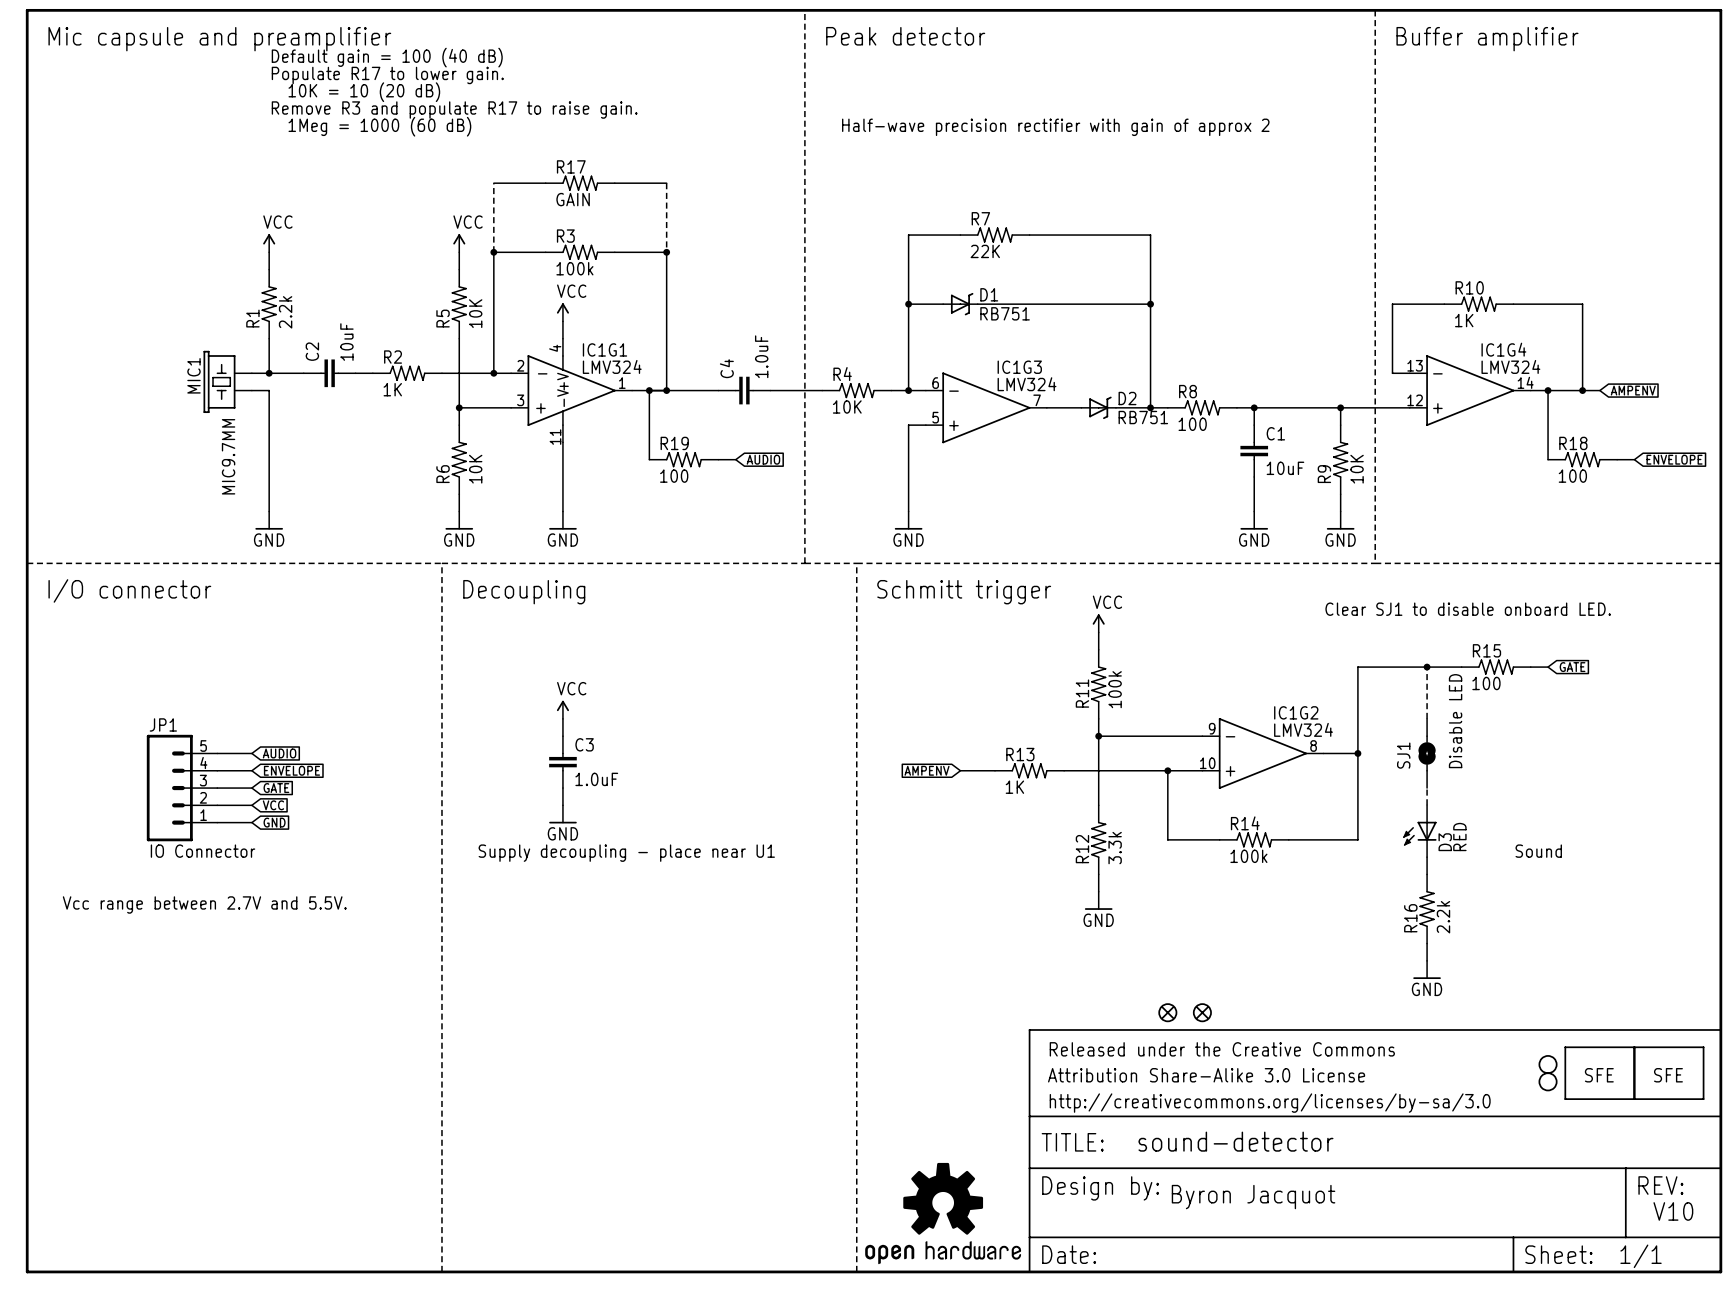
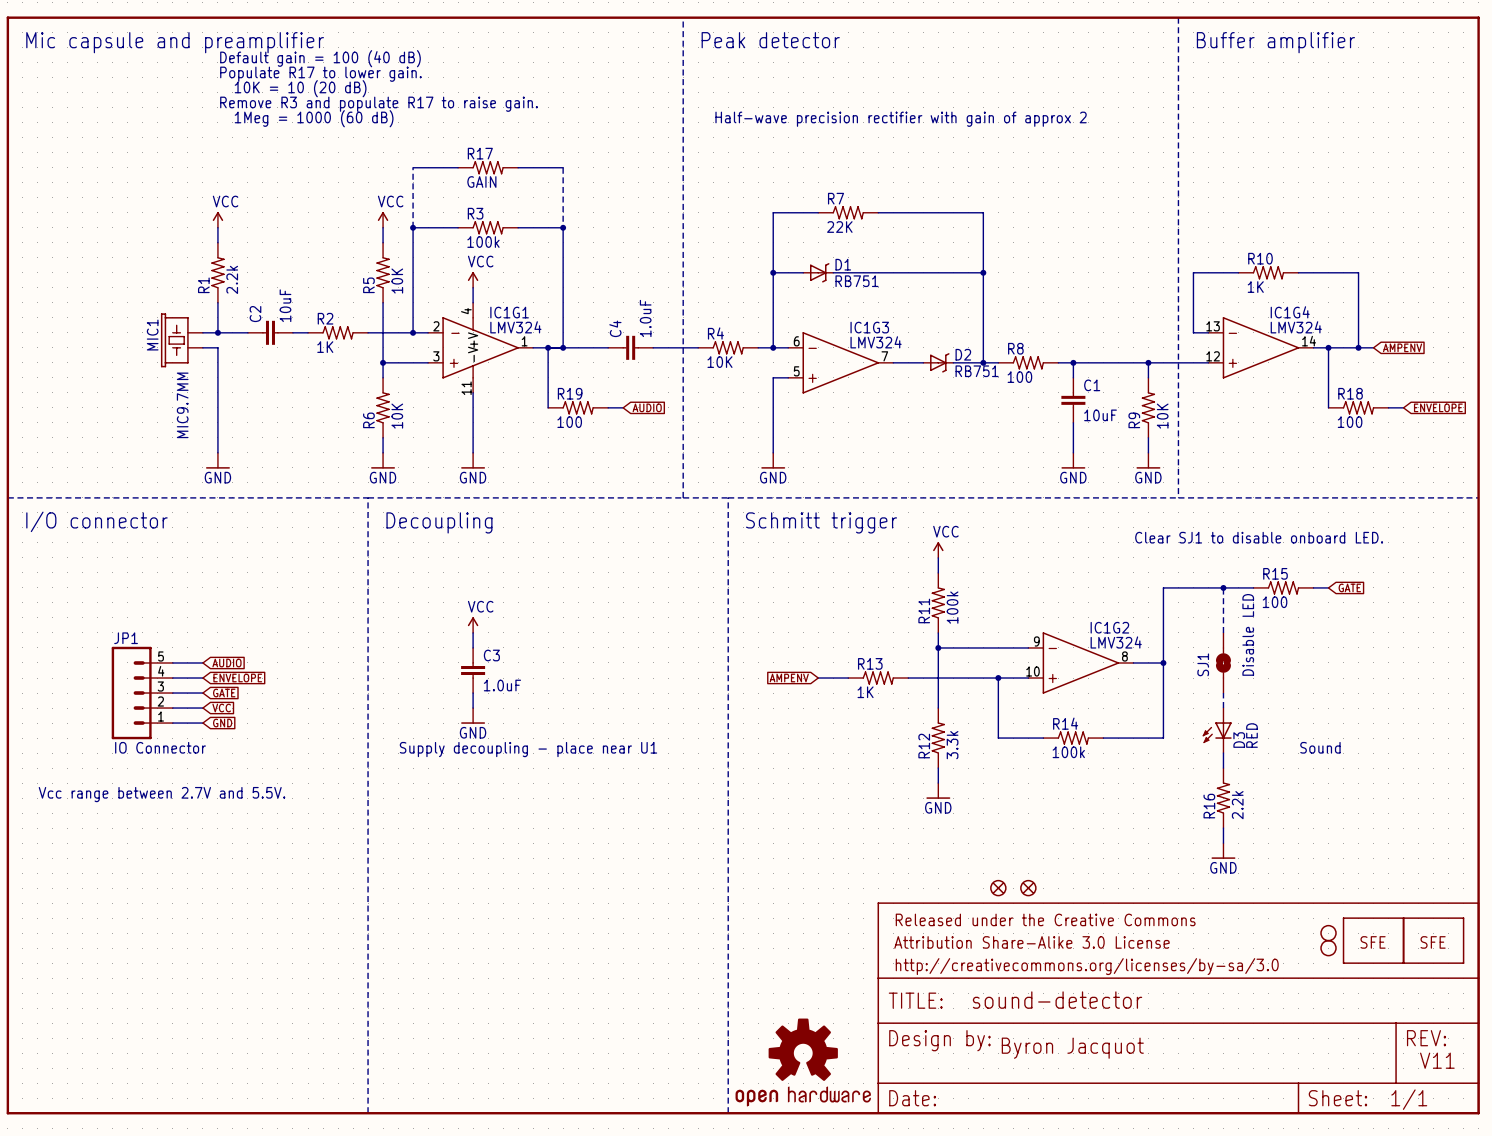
text: V10 (1673, 1211) -> V11 (1437, 1060)

